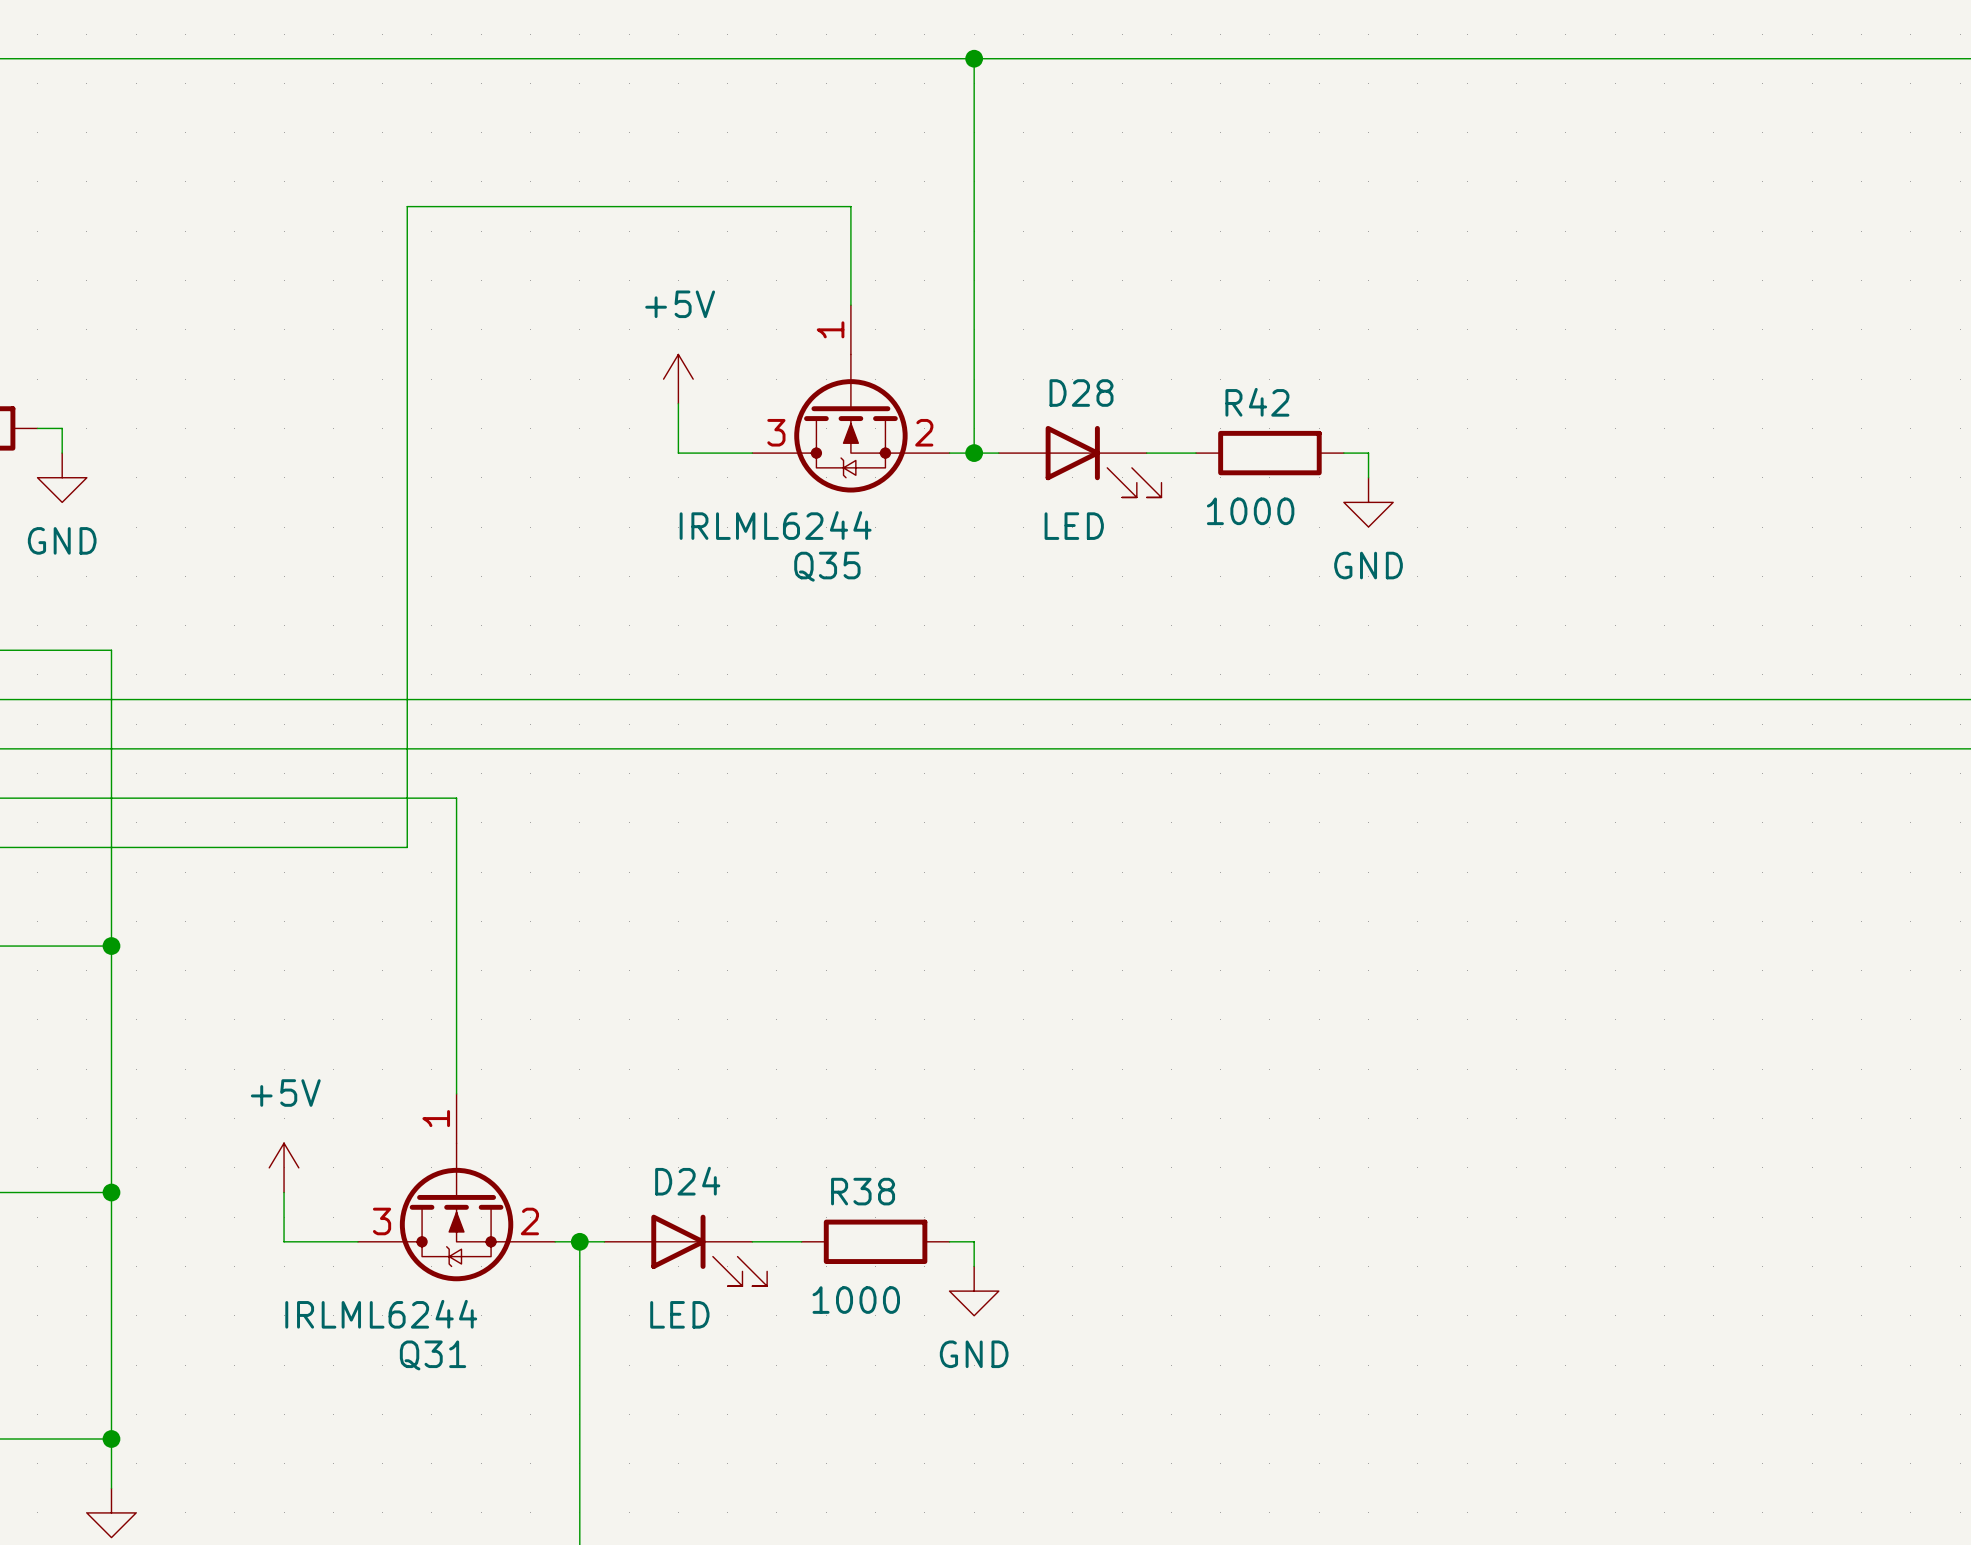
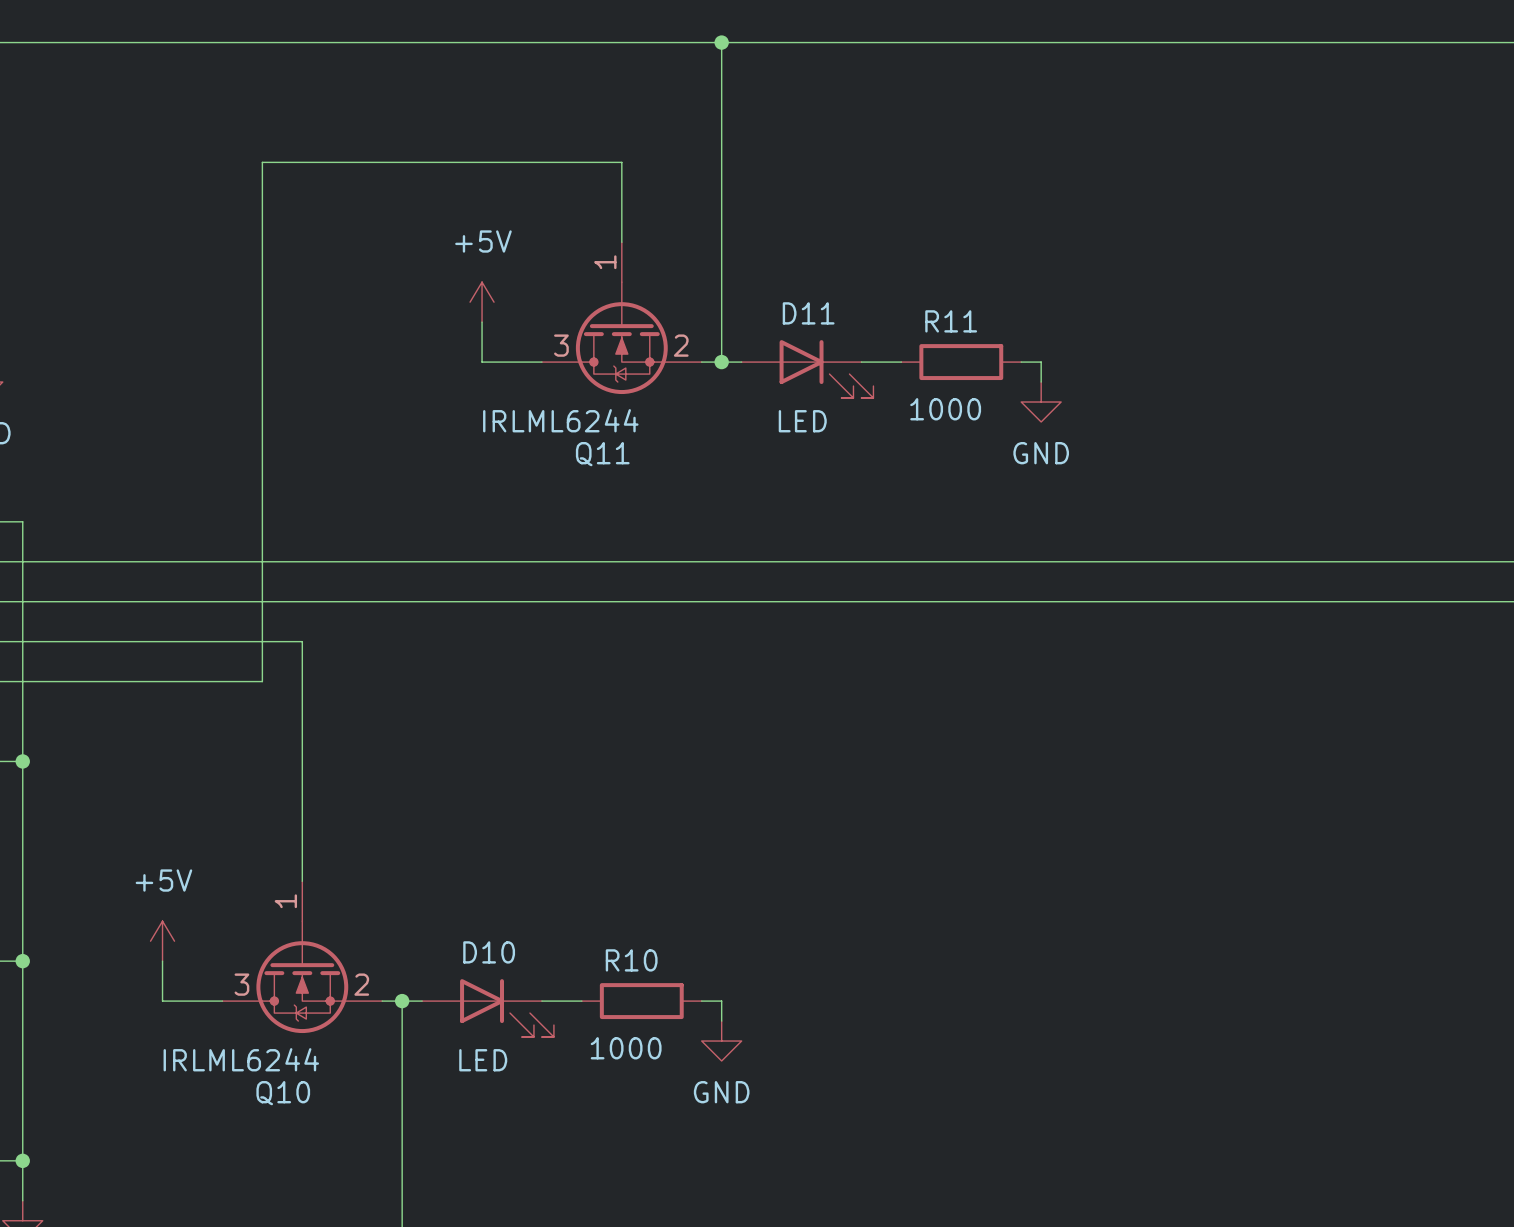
D28 name: D28 (1081, 393) -> D11 (808, 313)
R42 name: R42 (1257, 402) -> R11 (951, 321)
Q35 name: Q35 (827, 566) -> Q11 (602, 454)
D24 name: D24 (687, 1181) -> D10 (489, 952)
R38 name: R38 (863, 1191) -> R10 (631, 960)
Q31 name: Q31 (433, 1355) -> Q10 (283, 1093)

